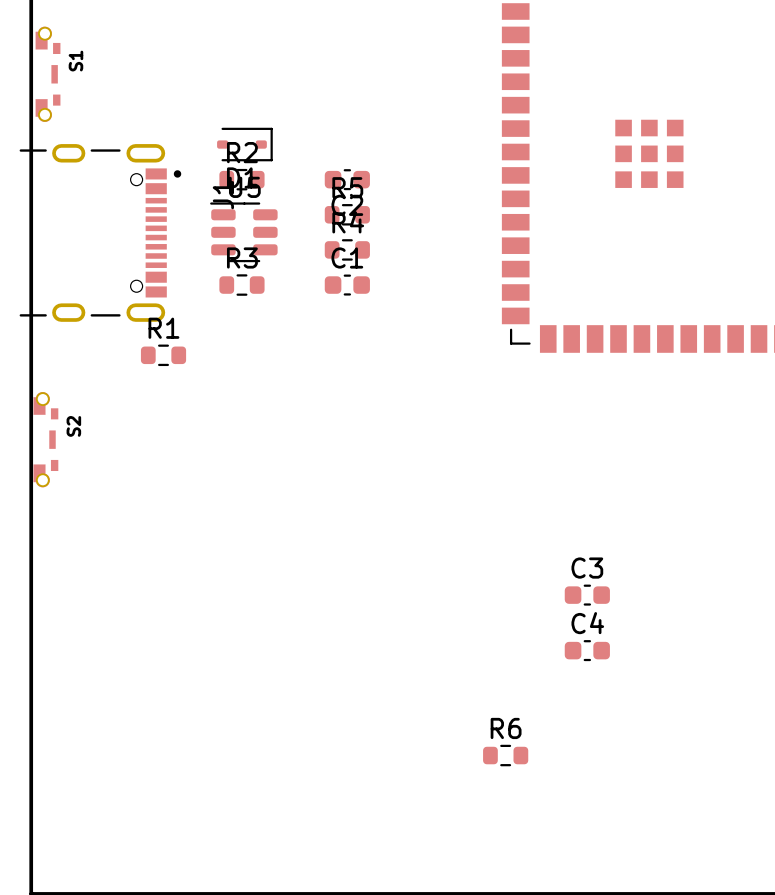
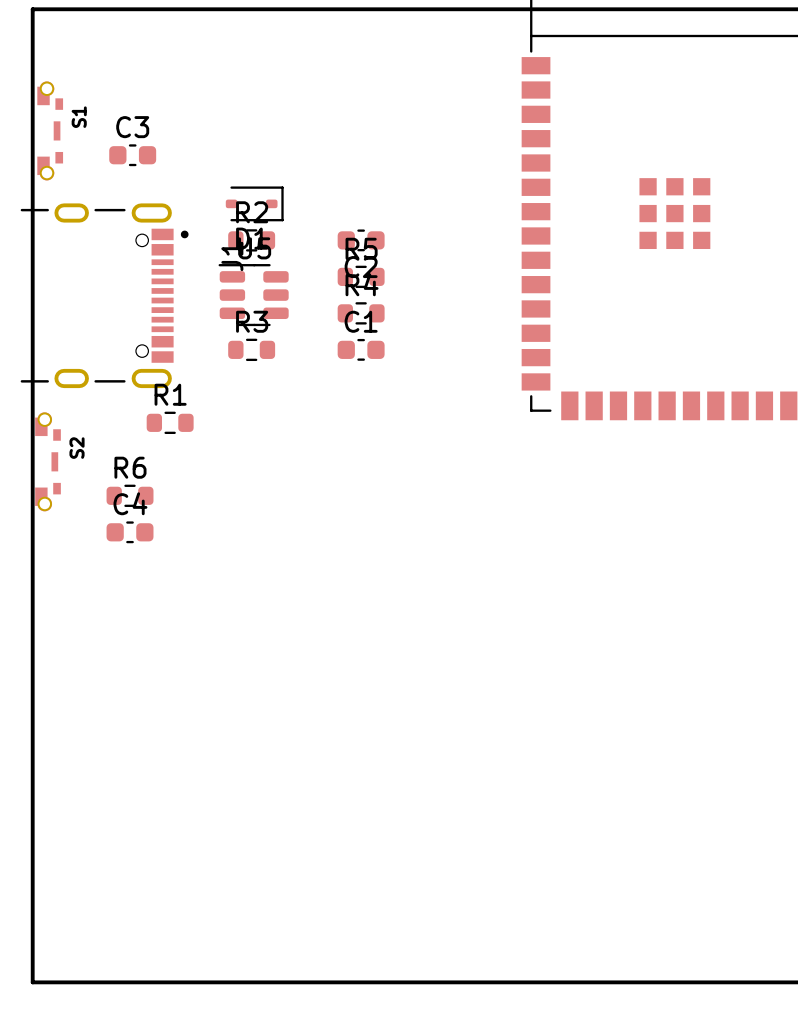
S2 position: (45, 439) -> (47, 461)
C3 position: (587, 595) -> (132, 155)
C4 position: (587, 650) -> (130, 532)
R6 position: (505, 755) -> (130, 495)

